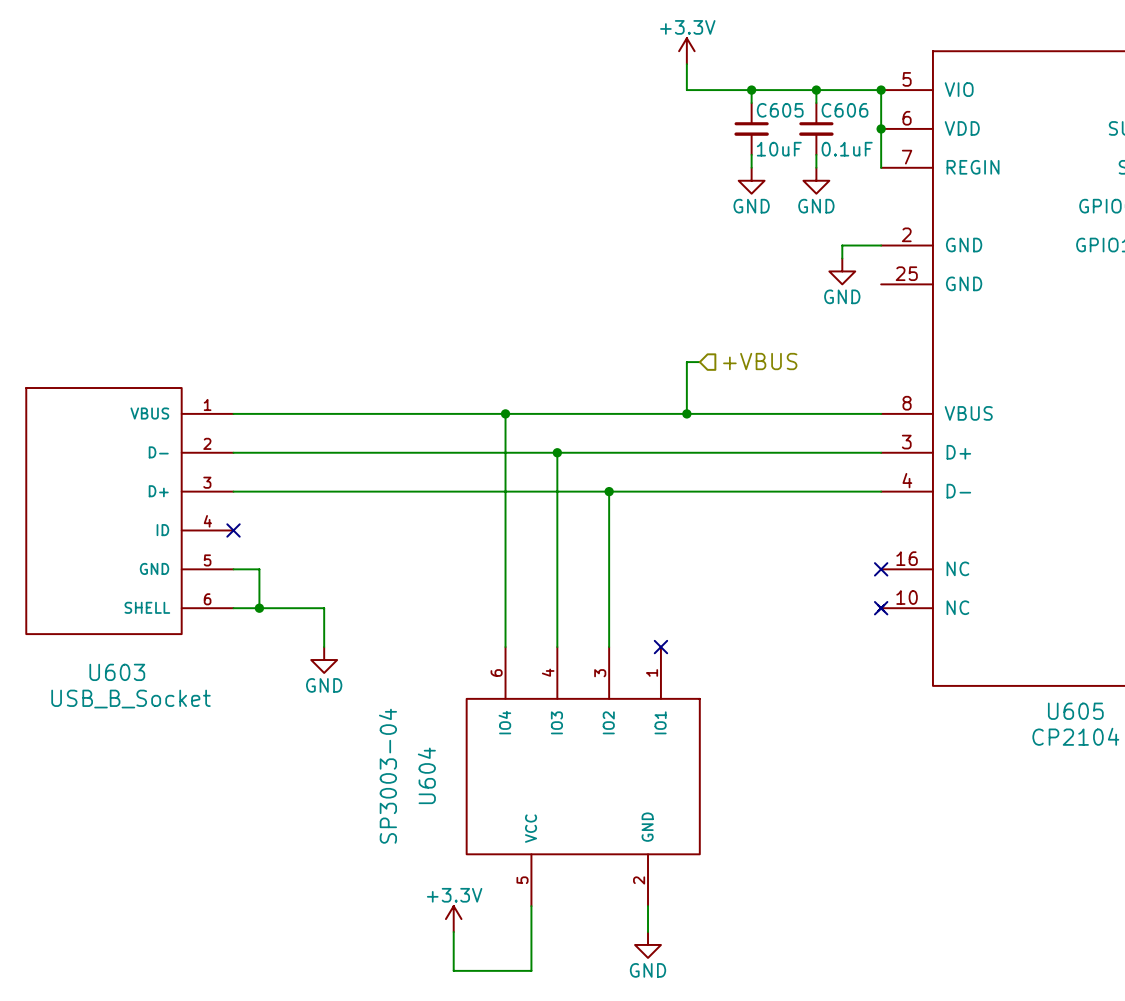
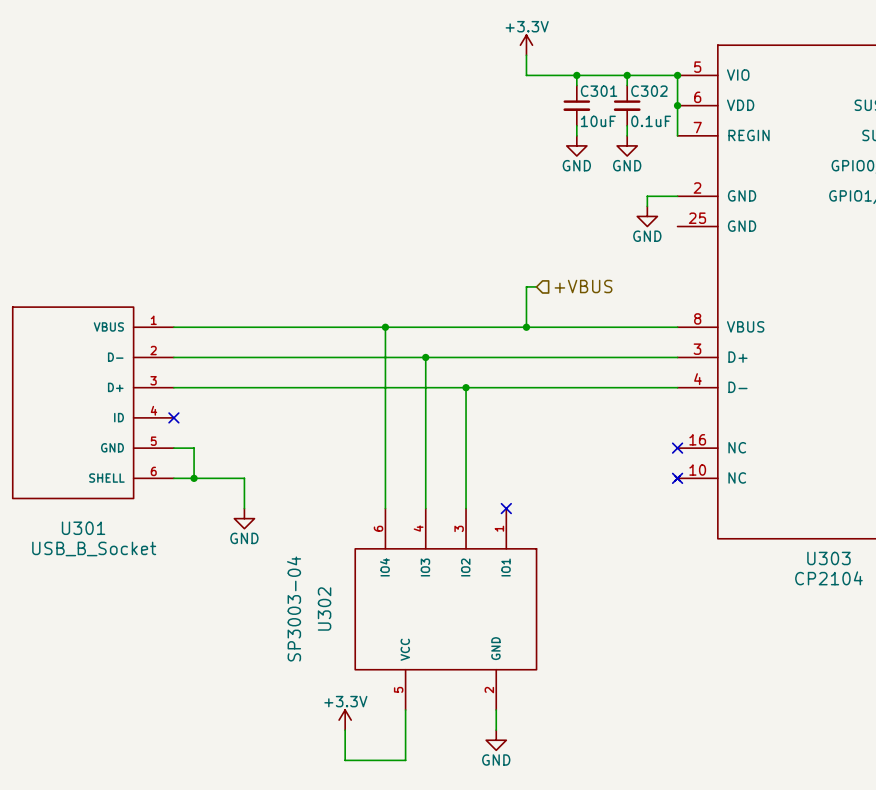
C605 name: C605 (780, 110) -> C301 (599, 91)
C606 name: C606 (844, 110) -> C302 (649, 91)
U603 name: U603 (117, 672) -> U301 (83, 528)
U605 name: U605 (1075, 711) -> U303 (828, 558)
U604 name: U604 (426, 775) -> U302 (324, 609)

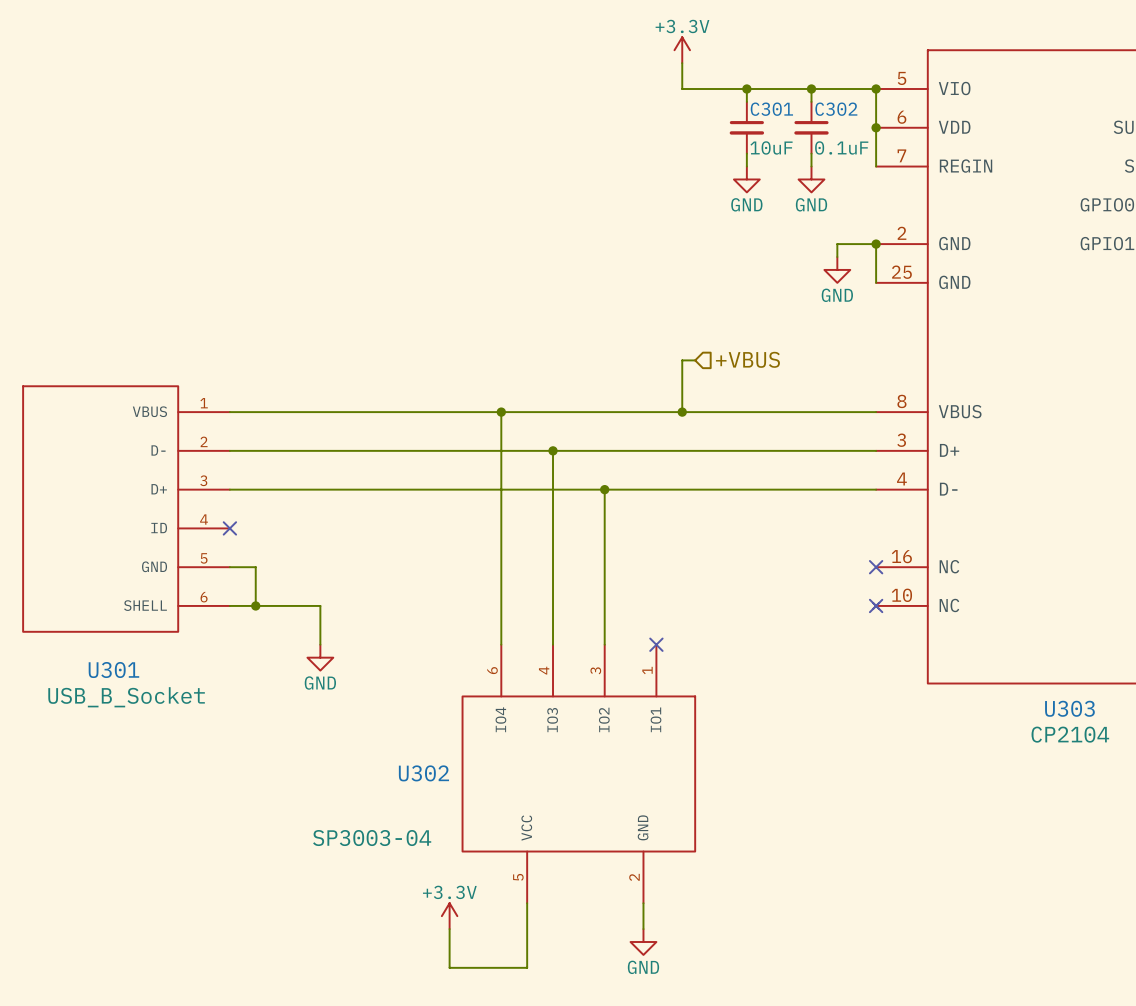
wire: none -> (876, 244) (876, 282)
junction: none -> (876, 244)
U302 value rotation: 0° (294, 609) -> 90° clockwise (372, 838)
U302 name rotation: 0° (324, 609) -> 90° clockwise (423, 773)

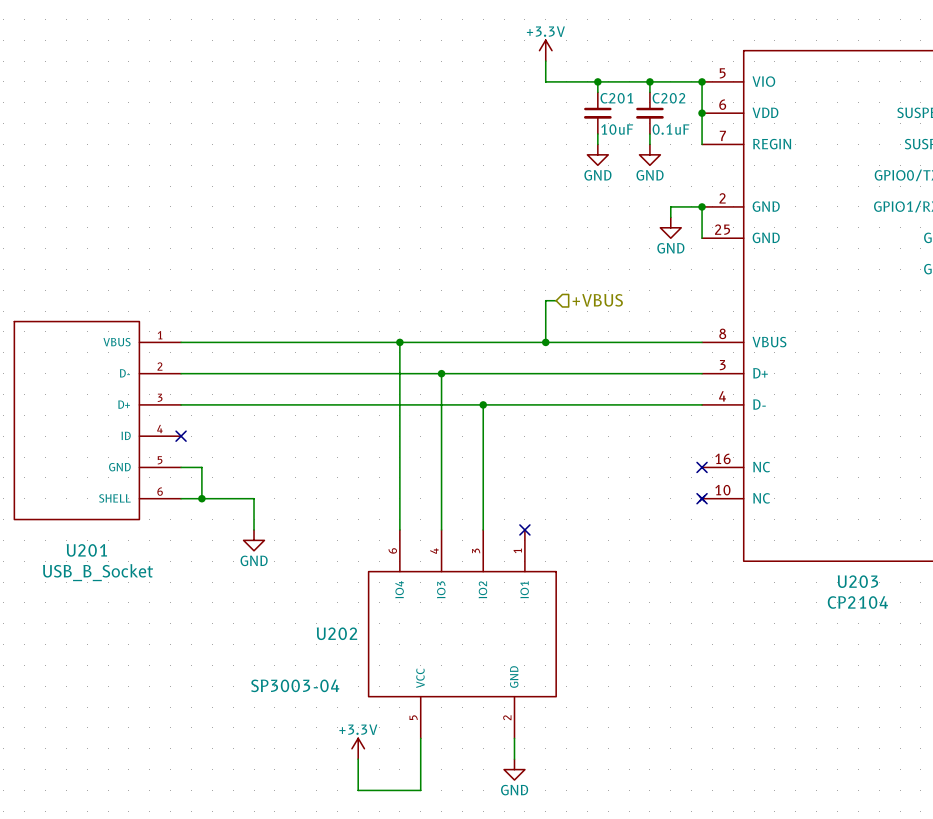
C301 name: C301 (771, 109) -> C201 (616, 98)
C302 name: C302 (836, 109) -> C202 (668, 98)
U301 name: U301 (113, 670) -> U201 (86, 550)
U303 name: U303 (1069, 708) -> U203 (857, 581)
U302 name: U302 (423, 773) -> U202 (336, 633)

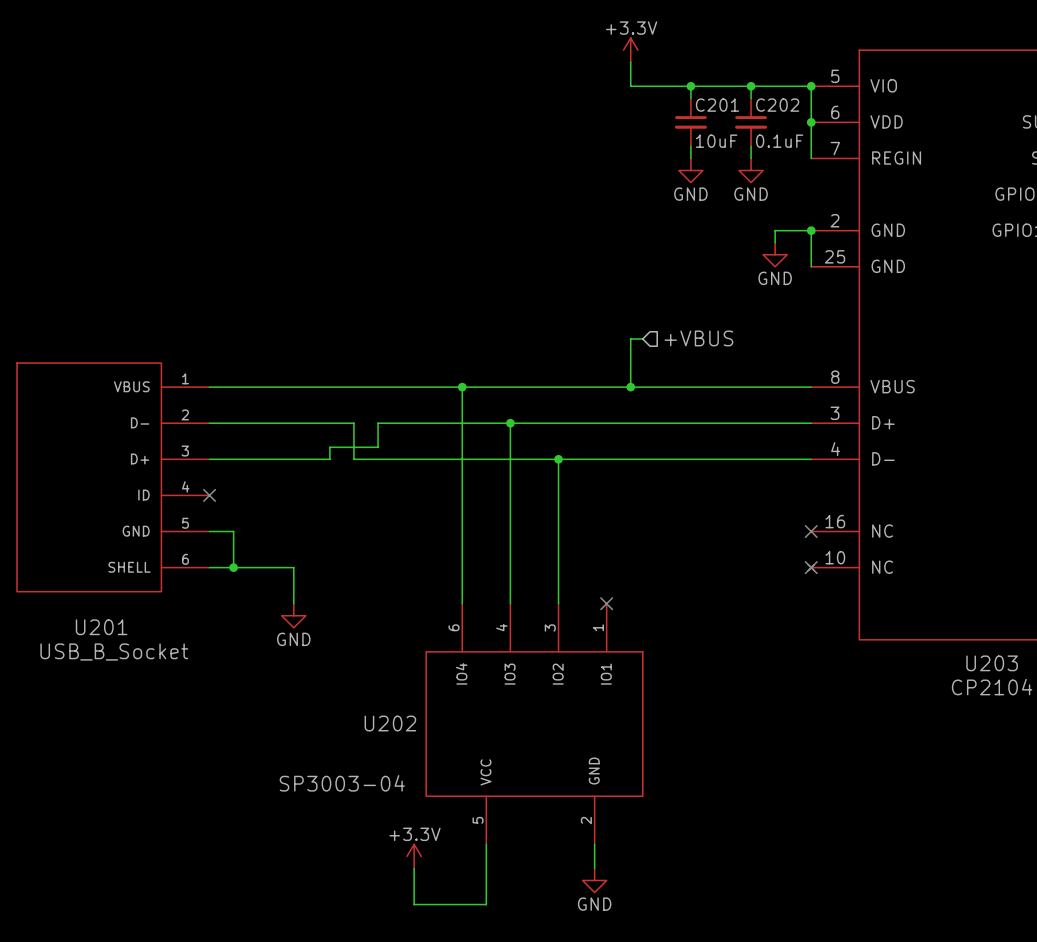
wire: (306, 373) (326, 373) -> (329, 459) (329, 447) (378, 447) (378, 423)
wire: (285, 404) (306, 404) -> (353, 423) (353, 459)

